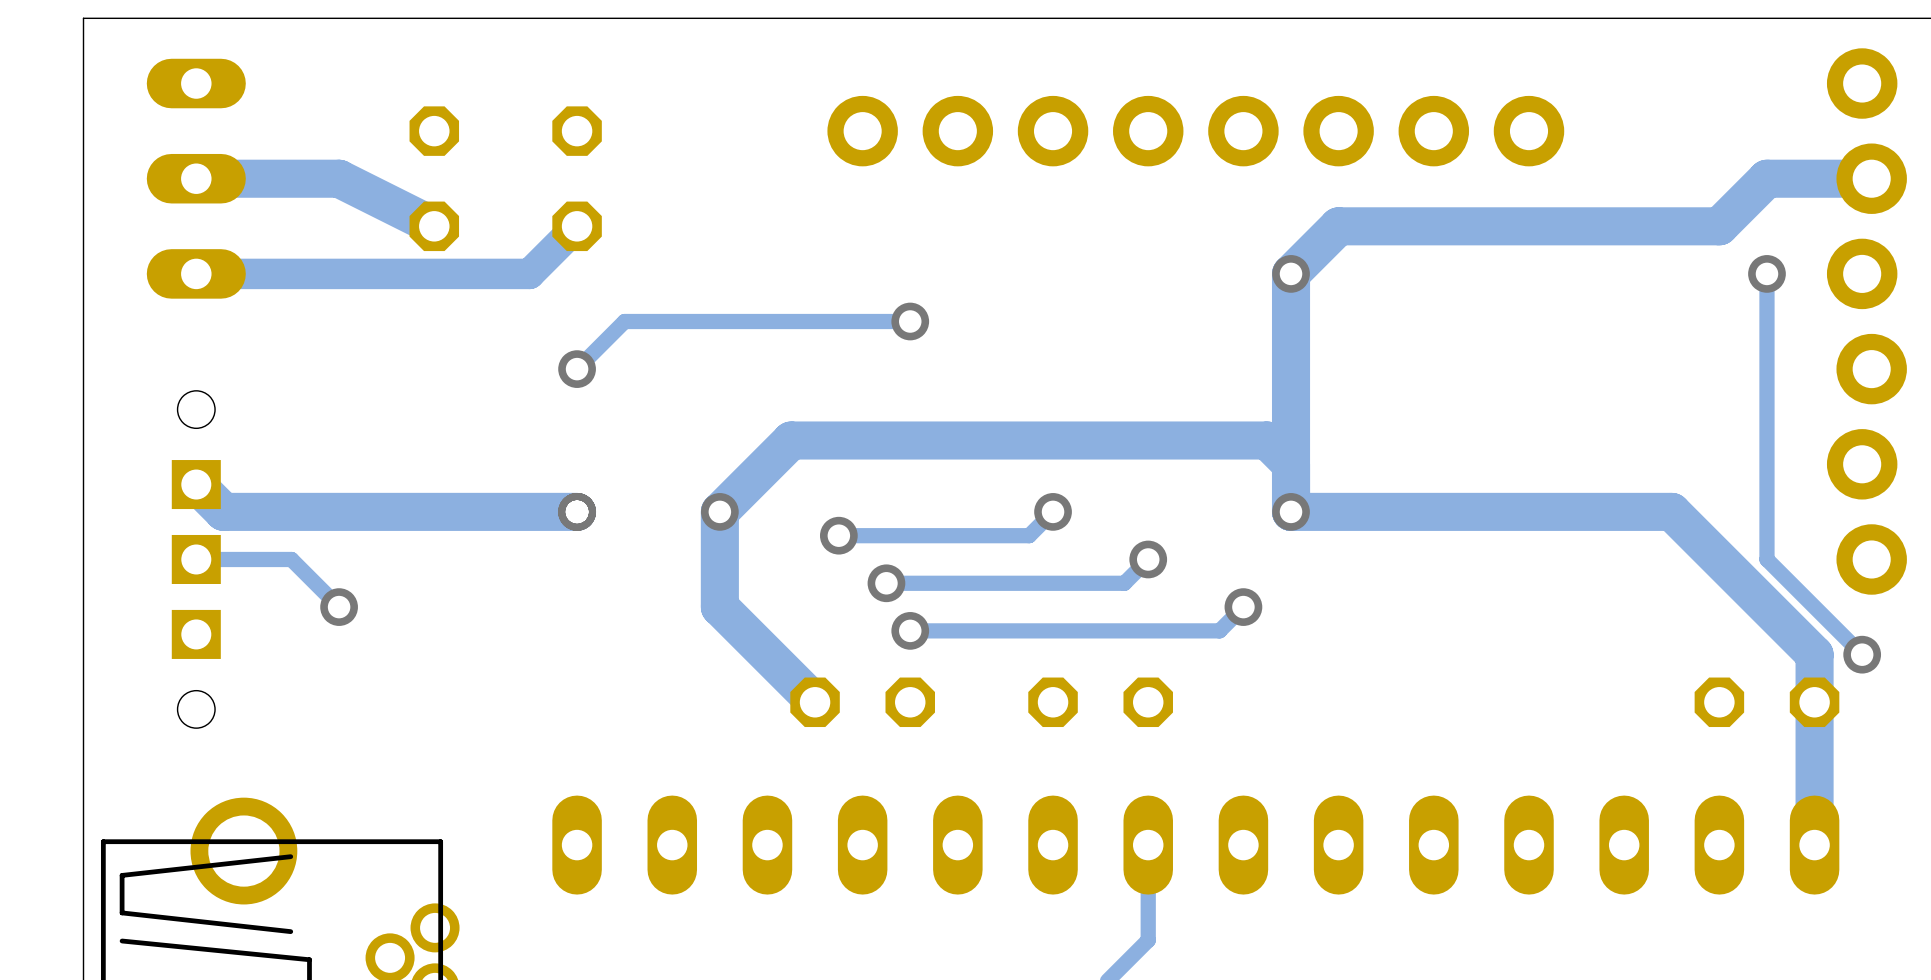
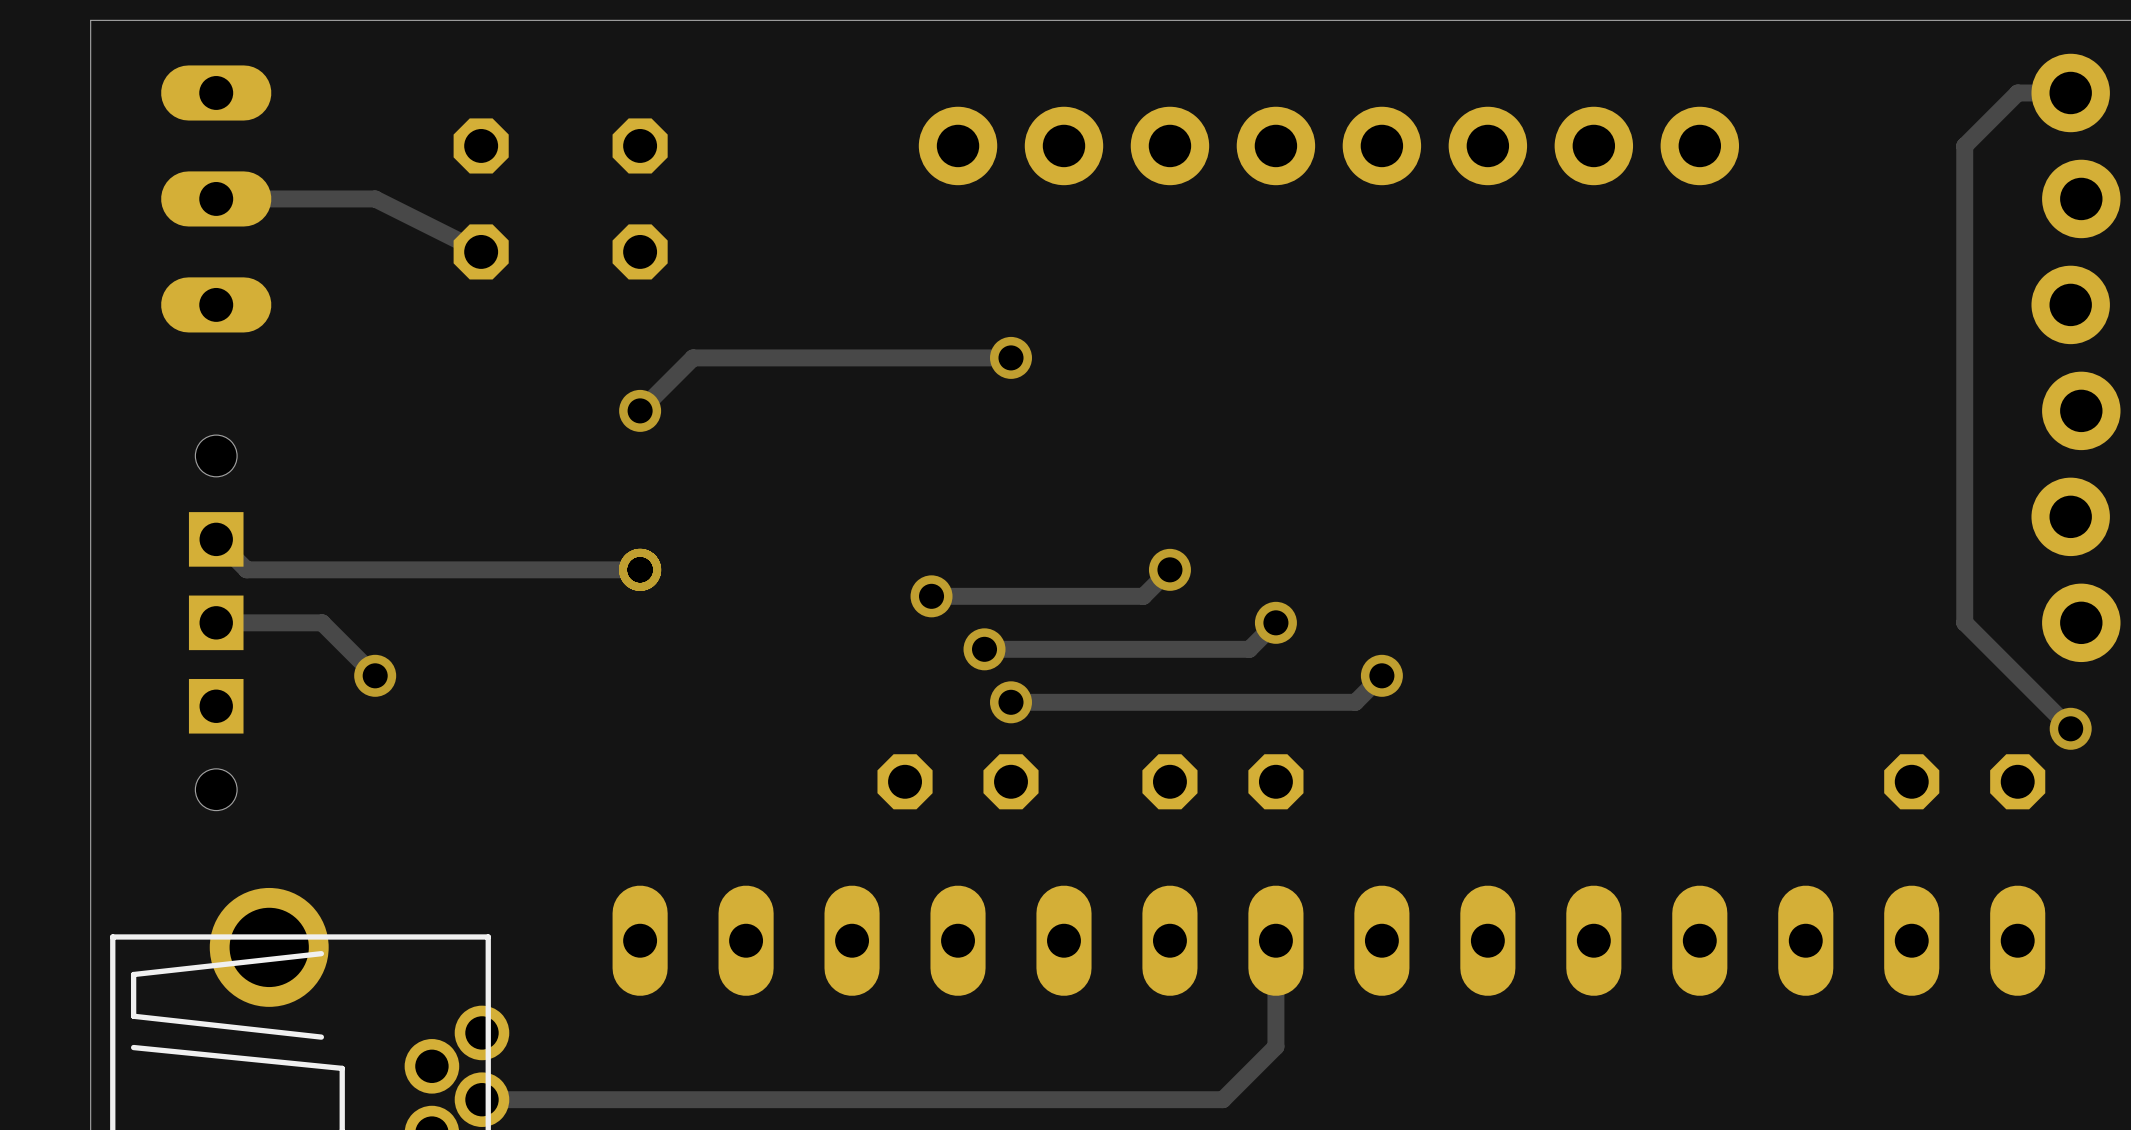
track: none -> (2070, 92) (2017, 92) (1964, 145) (1964, 304)
track width: thick (196, 178) (339, 178) (434, 226) -> thin (216, 198) (375, 198) (481, 251)
track: (1871, 178) (1766, 178) (1719, 226) (1338, 226) (1291, 273) (1291, 511) (1671, 511) (1814, 654) (1814, 845) (1814, 702) -> none
track: (577, 226) (529, 273) (196, 273) -> none
via: (1291, 273) -> none
via: (1766, 273) -> none
track: (1291, 464) (1267, 440) (791, 440) (719, 511) (719, 607) (815, 702) -> none
track width: thick (196, 484) (223, 511) (577, 511) -> thin (216, 539) (246, 569) (640, 569)
via: (719, 511) -> none
via: (1291, 511) -> none

